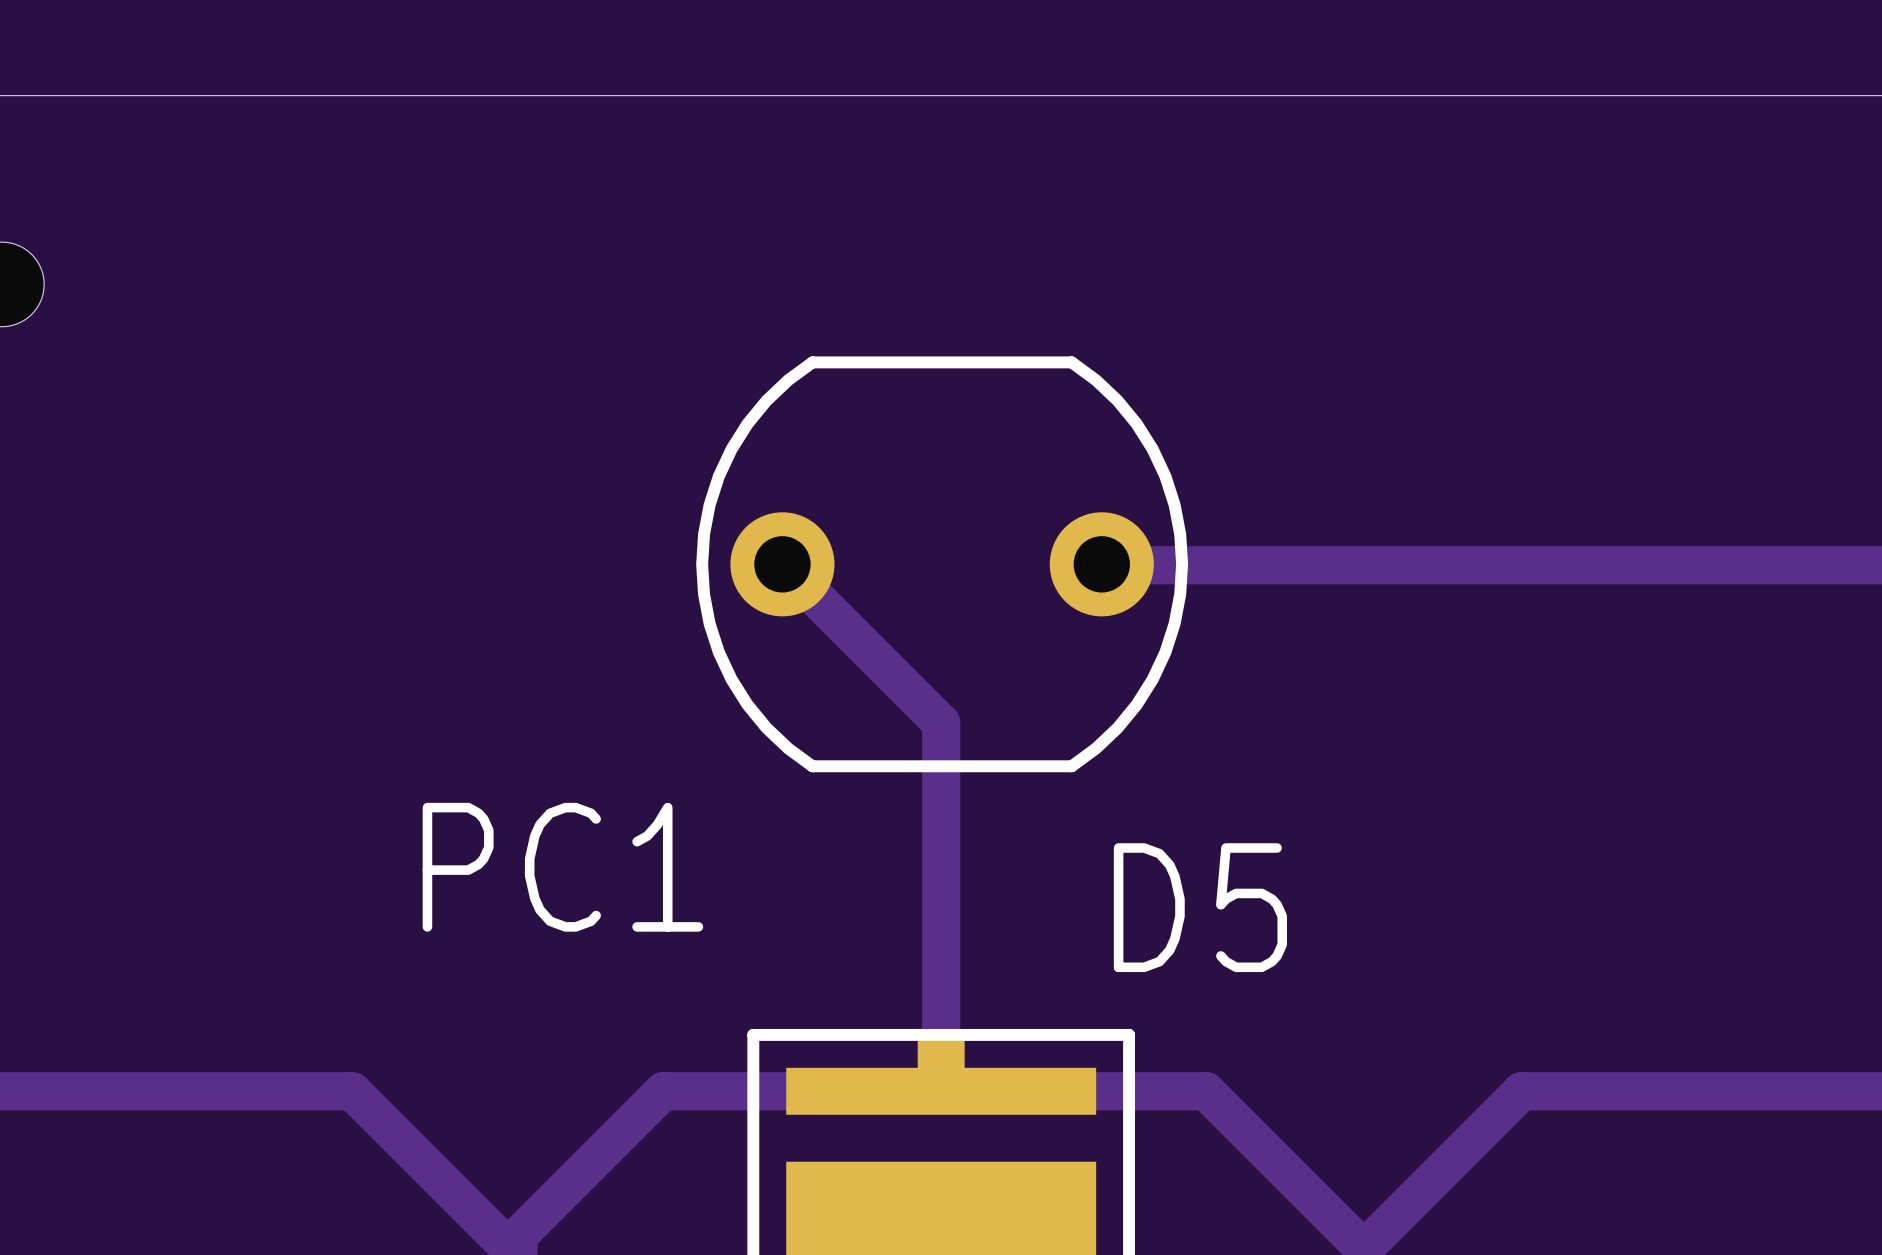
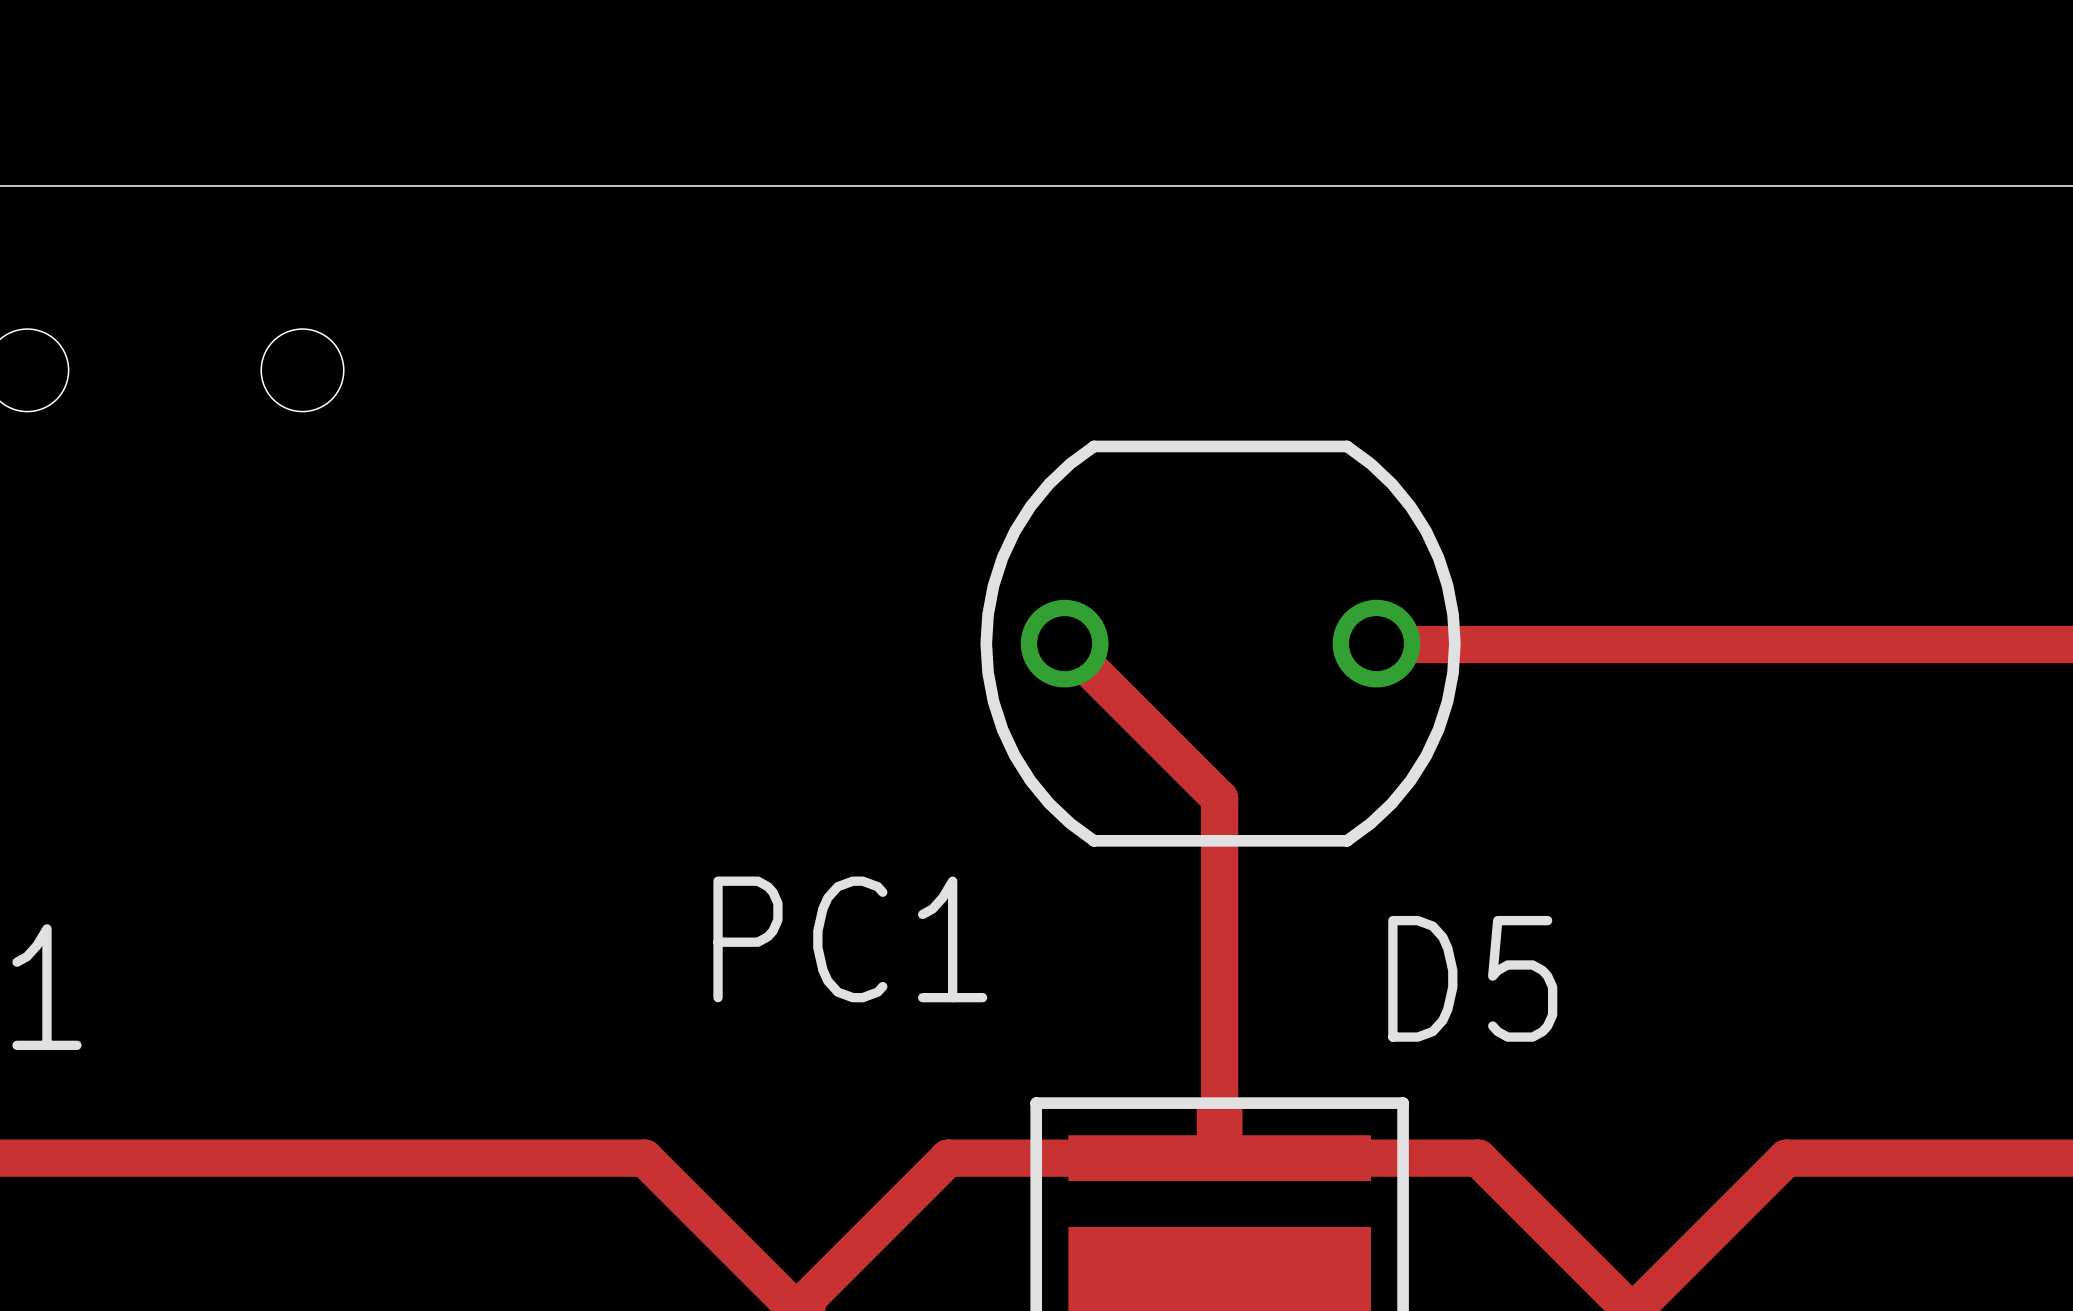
PC1 footprint: [696, 356, 1189, 773] -> [980, 440, 1461, 847]

